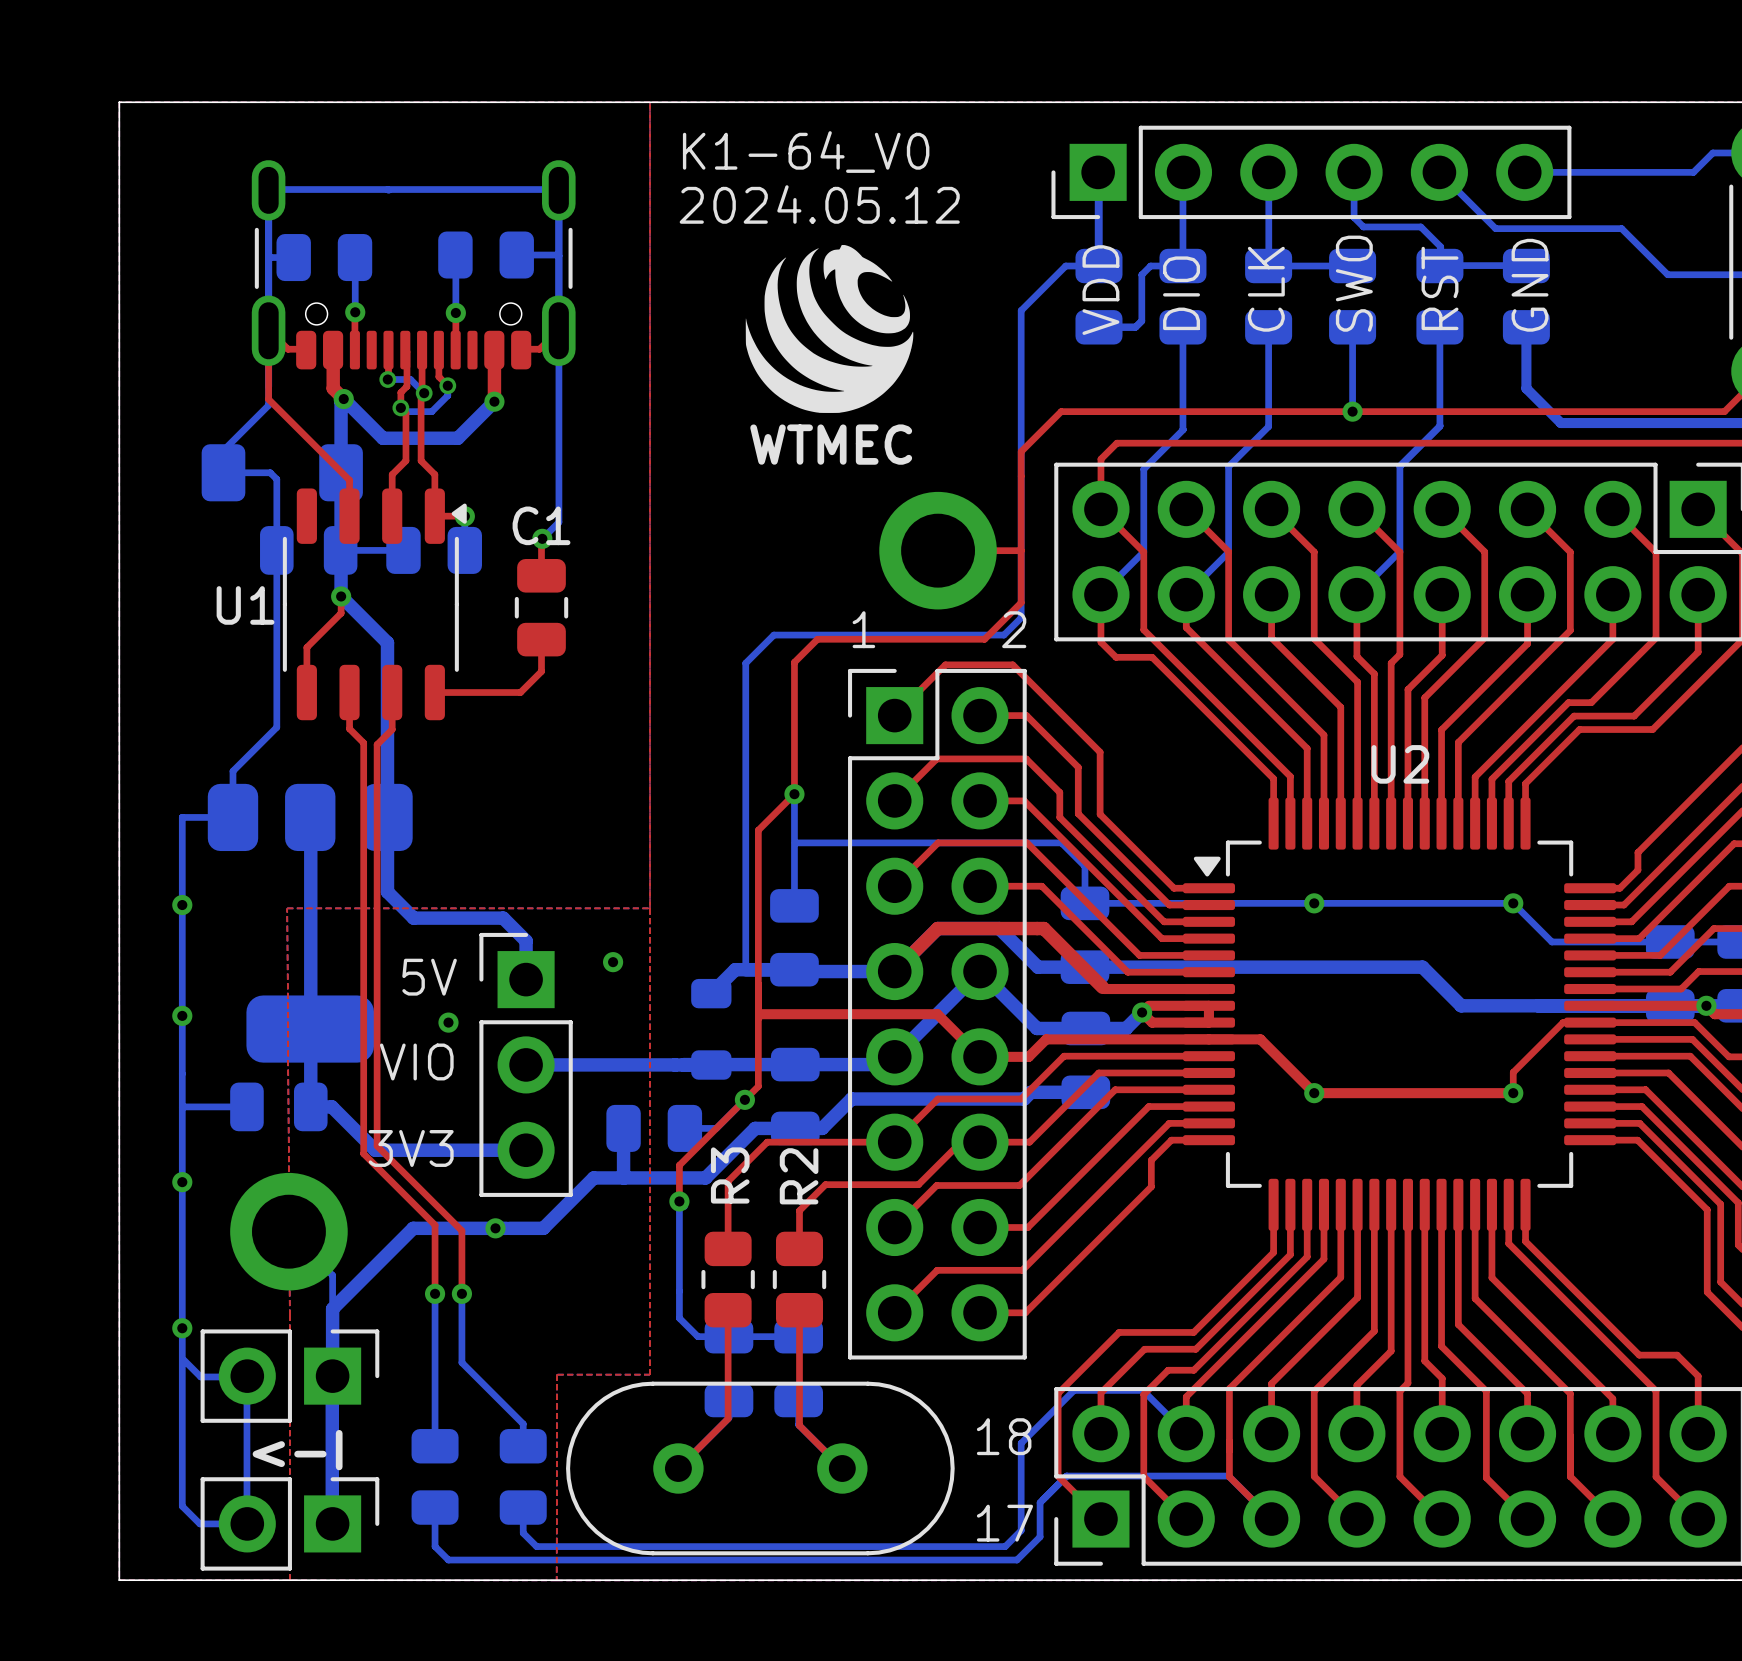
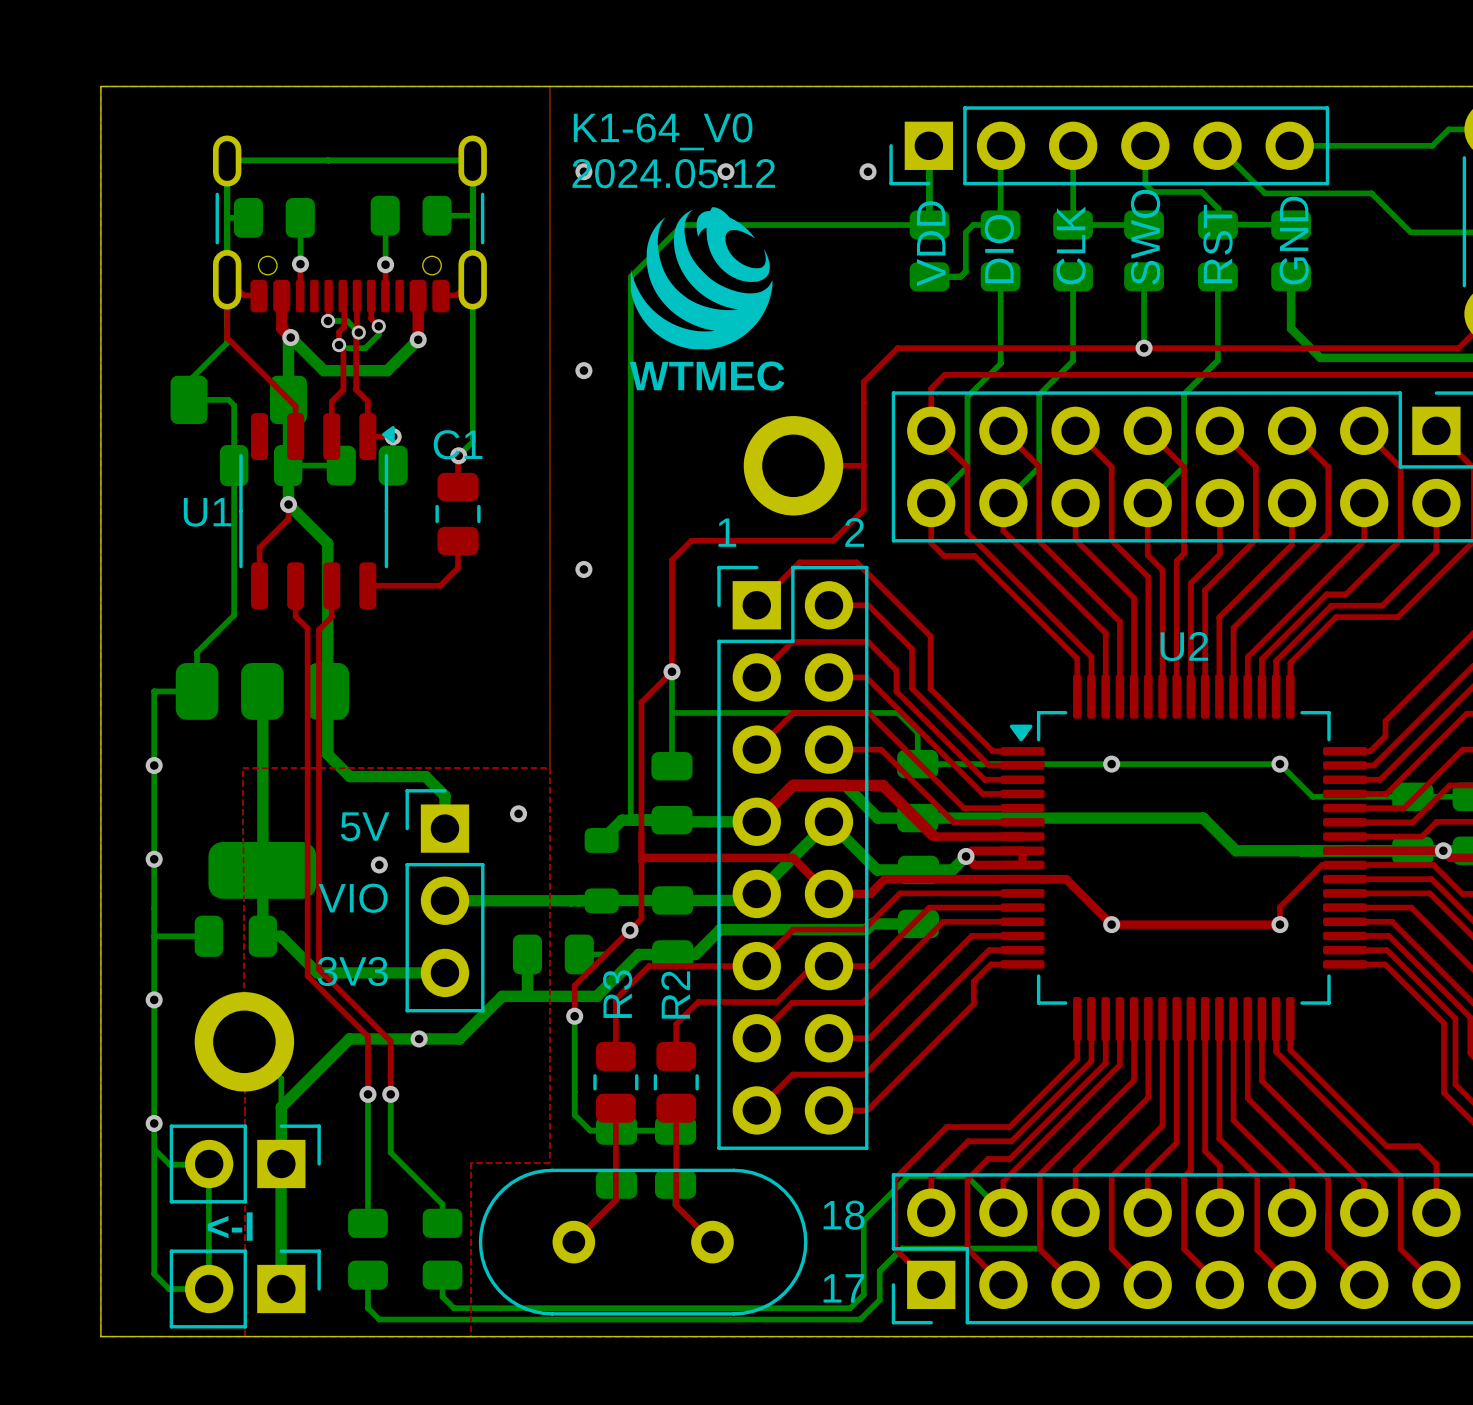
via: none -> (583, 171)
via: none -> (725, 171)
via: none -> (868, 171)
bottom track: (1065, 266) (1021, 310) (1021, 617) (1003, 635) (773, 635) (745, 663) -> (901, 225) (682, 225) (630, 276) (630, 560)
via: none -> (583, 370)
via: none -> (583, 569)

